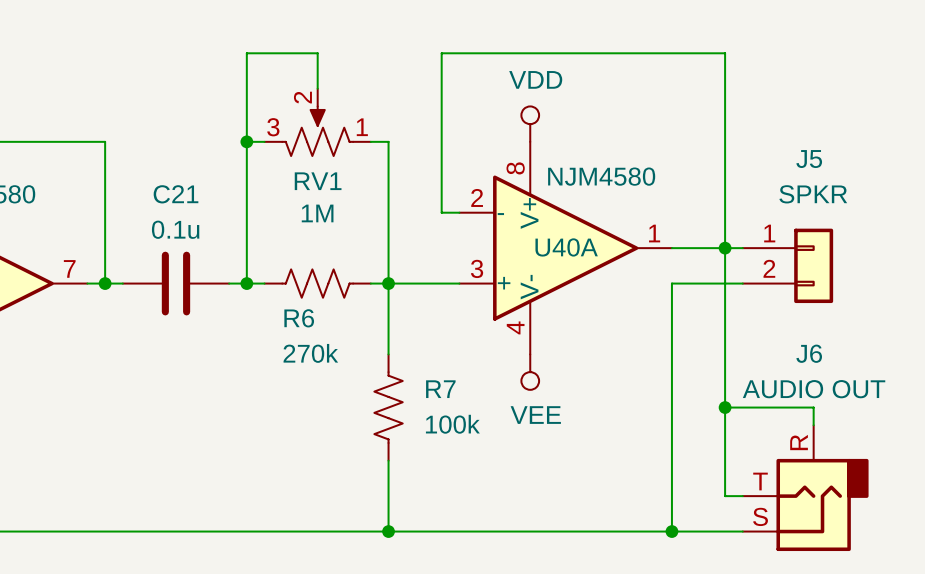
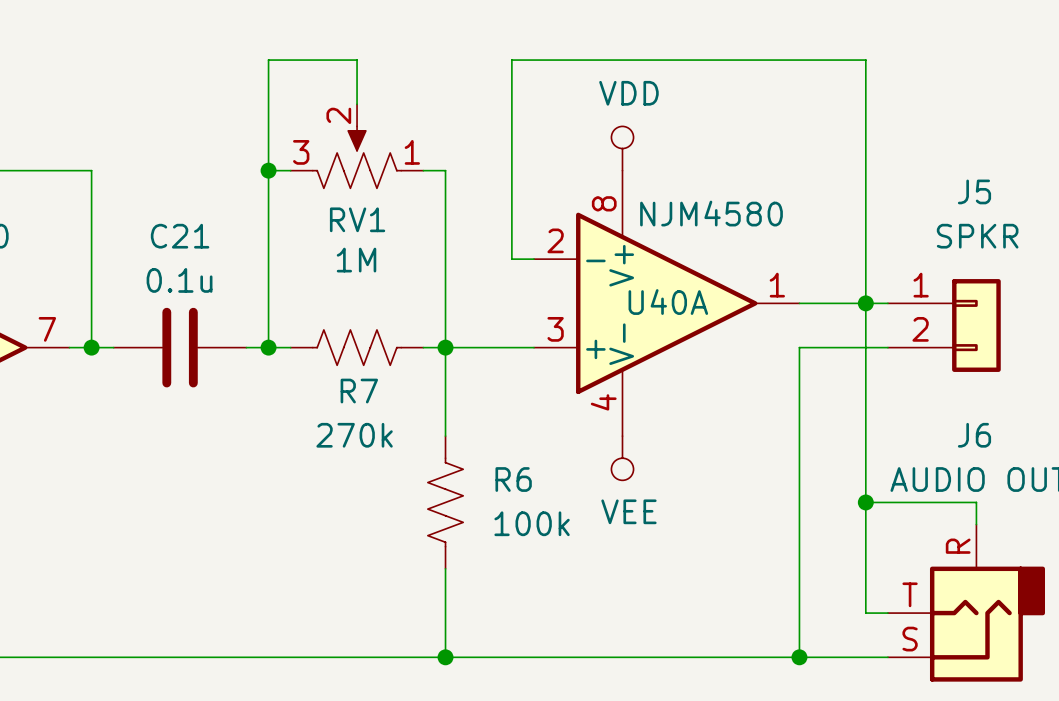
R6 name: R6 (299, 318) -> R7 (359, 391)
R7 name: R7 (440, 389) -> R6 (513, 479)

